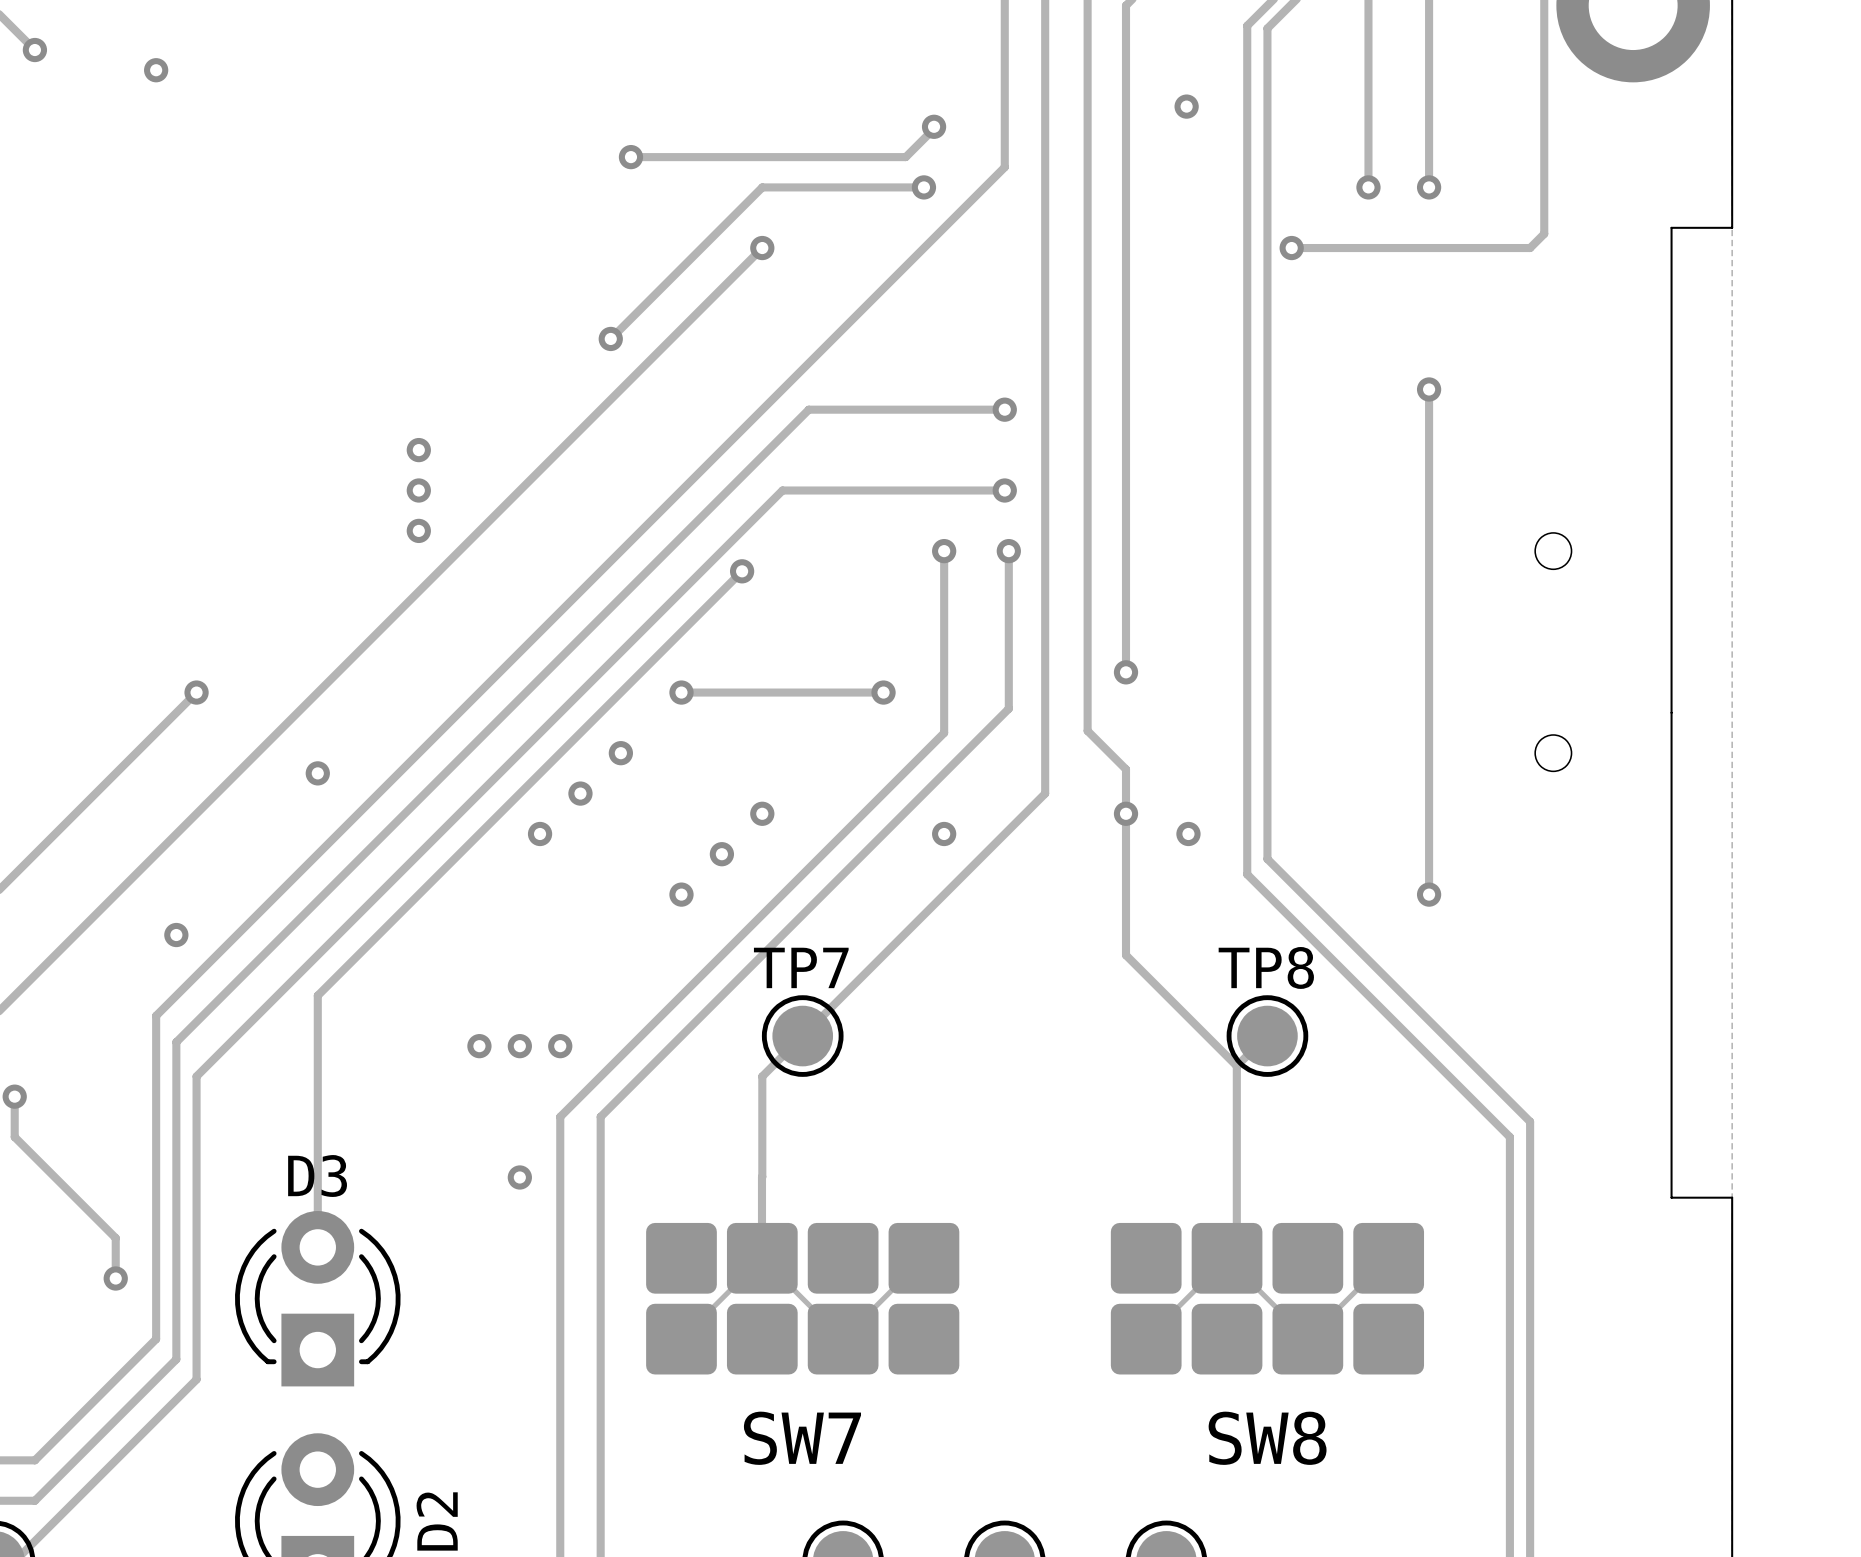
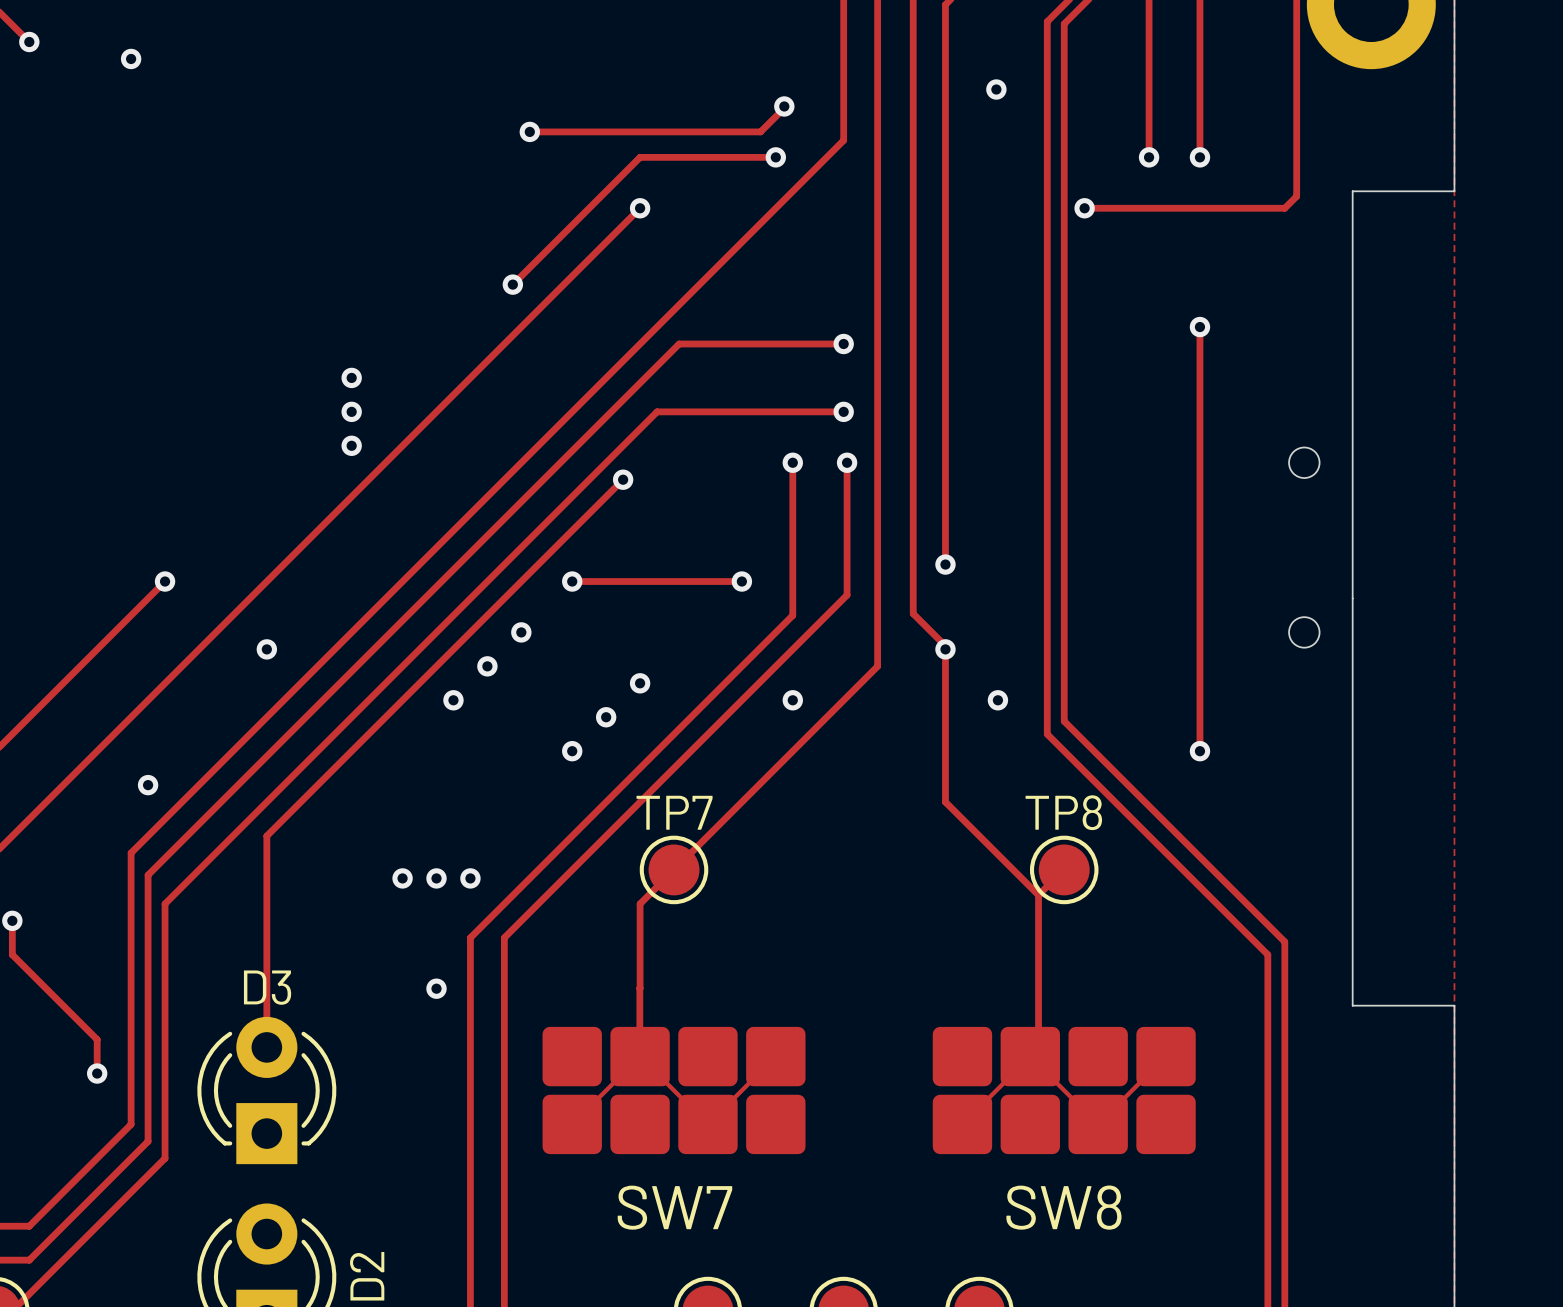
board edge: (1671, 227) (1671, 1197) -> (1403, 191) (1352, 191) (1352, 1005) (1403, 1005)
via position: (1126, 813) -> (945, 649)

